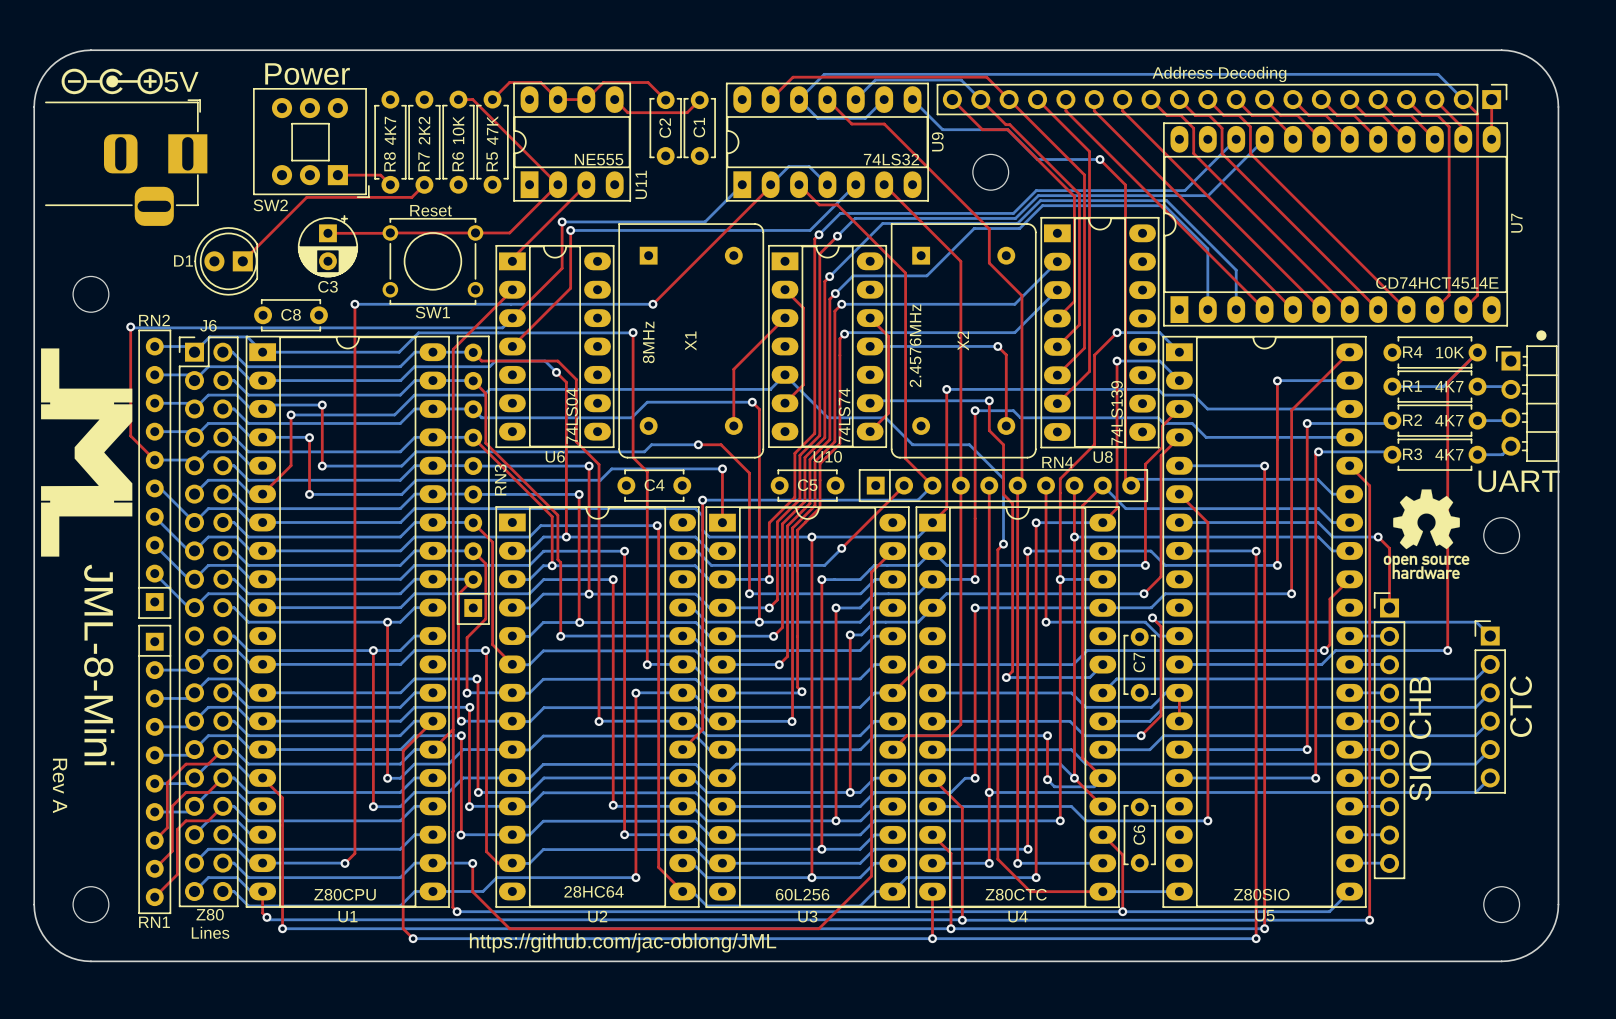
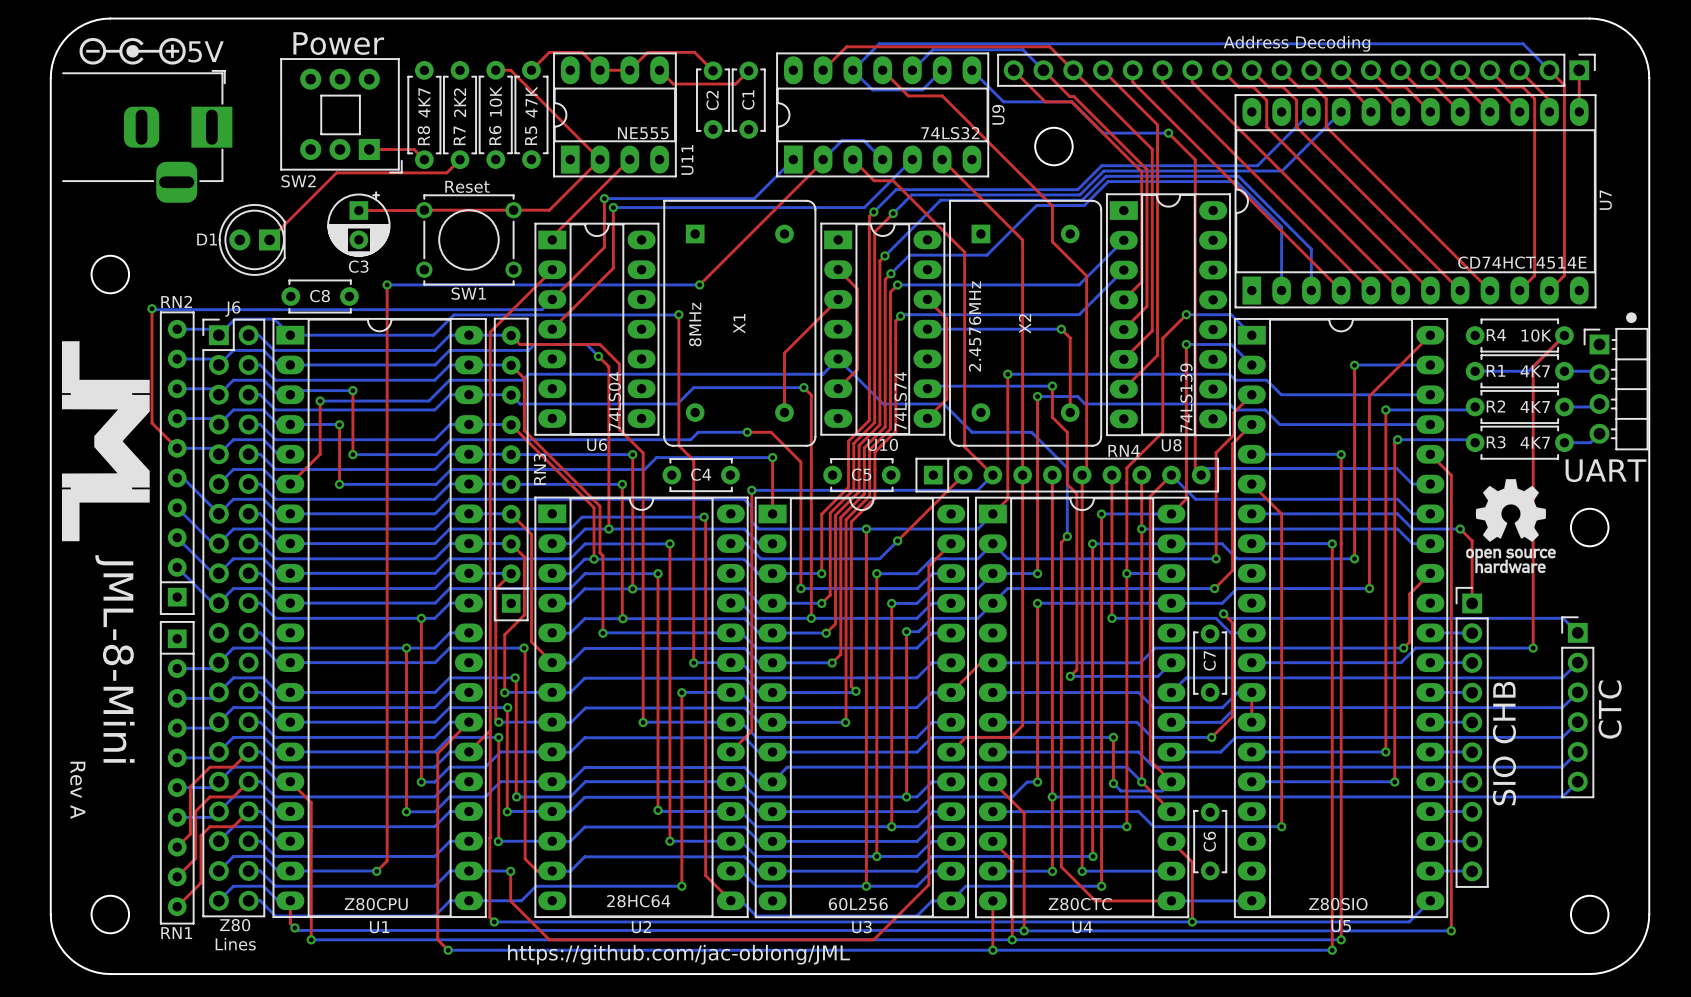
drawing shape: [41, 348, 133, 557] -> [61, 341, 150, 542]

